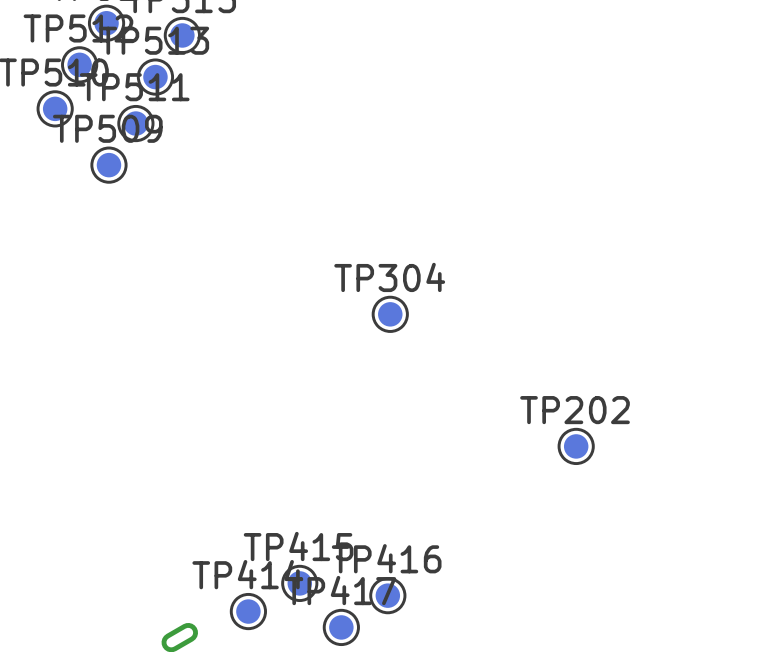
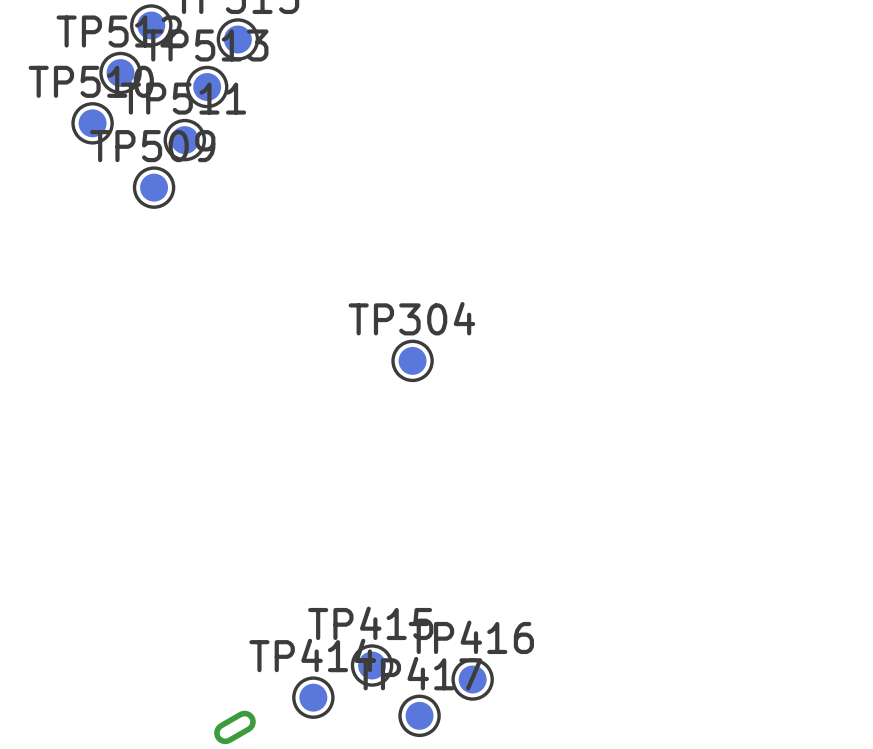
TP304 position: (390, 314) -> (412, 360)
TP202: (576, 446) -> none

